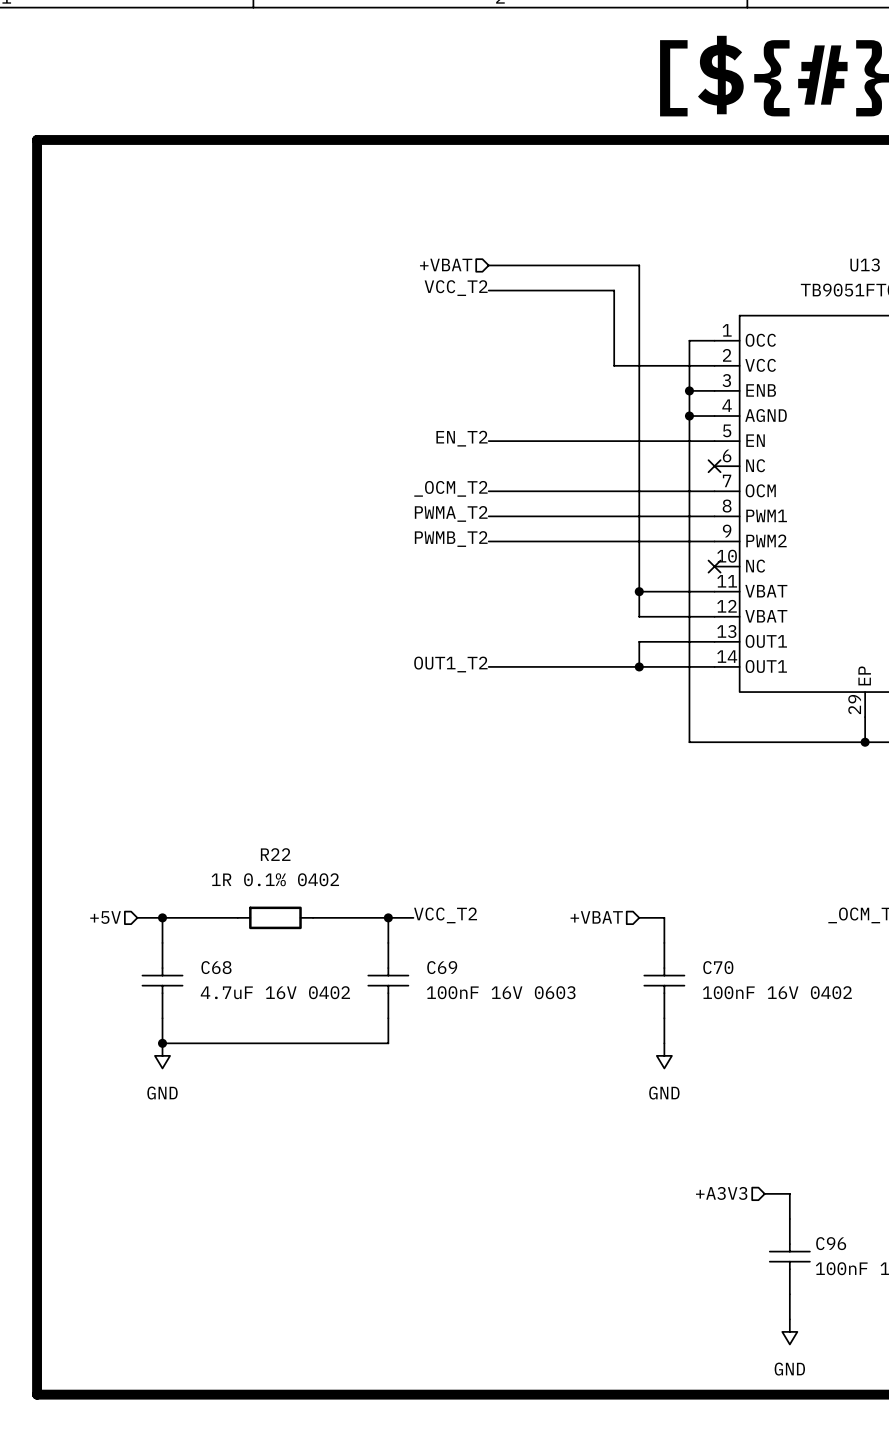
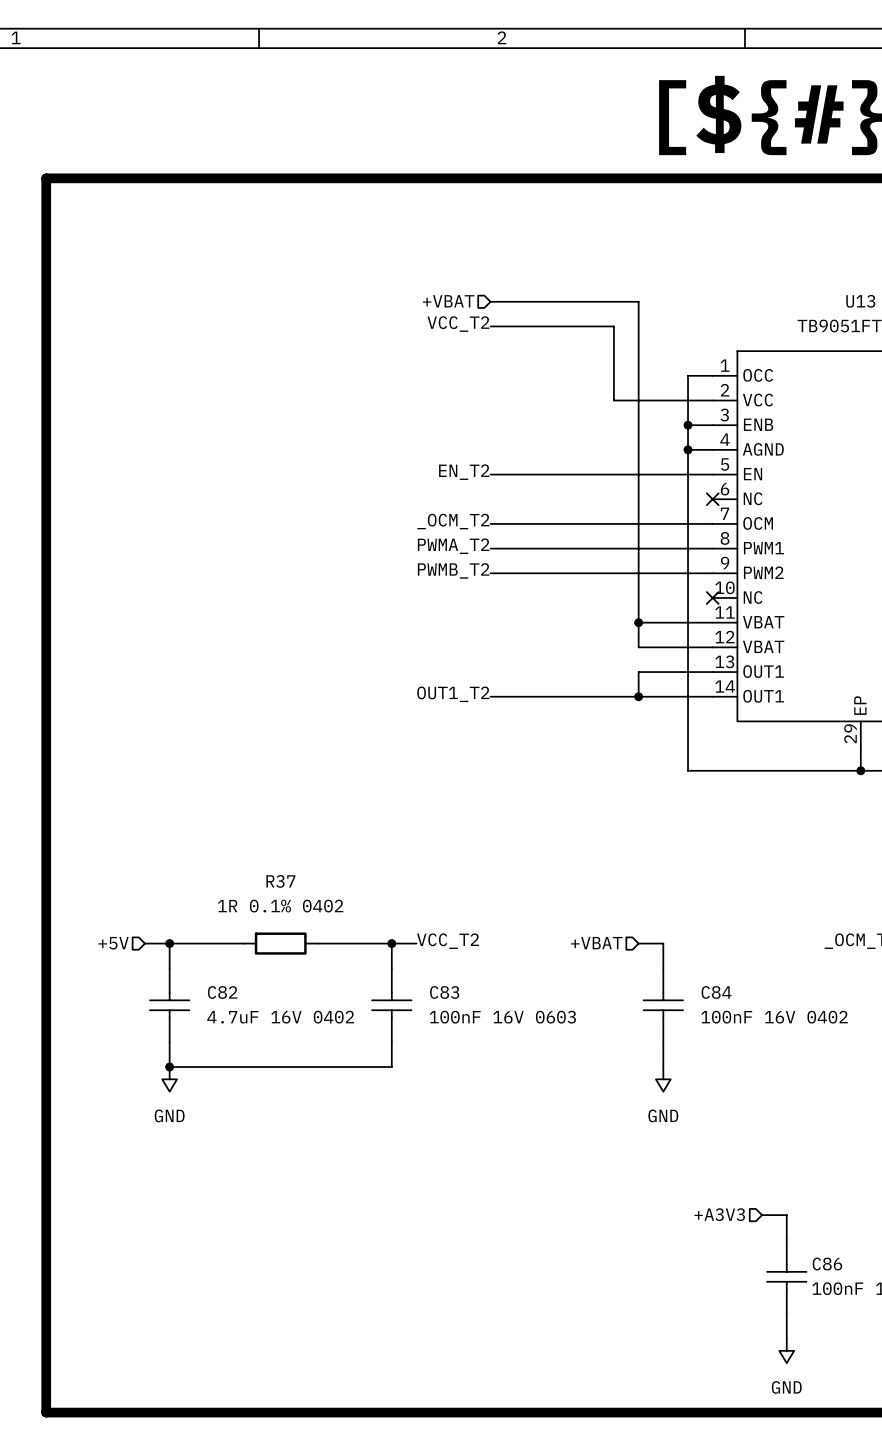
R22 name: R22 (275, 854) -> R37 (280, 881)
C68 name: C68 (216, 967) -> C82 (222, 992)
C69 name: C69 (442, 967) -> C83 (444, 992)
C70 name: C70 (718, 967) -> C84 (716, 992)
C96 name: C96 (831, 1243) -> C86 (827, 1264)

